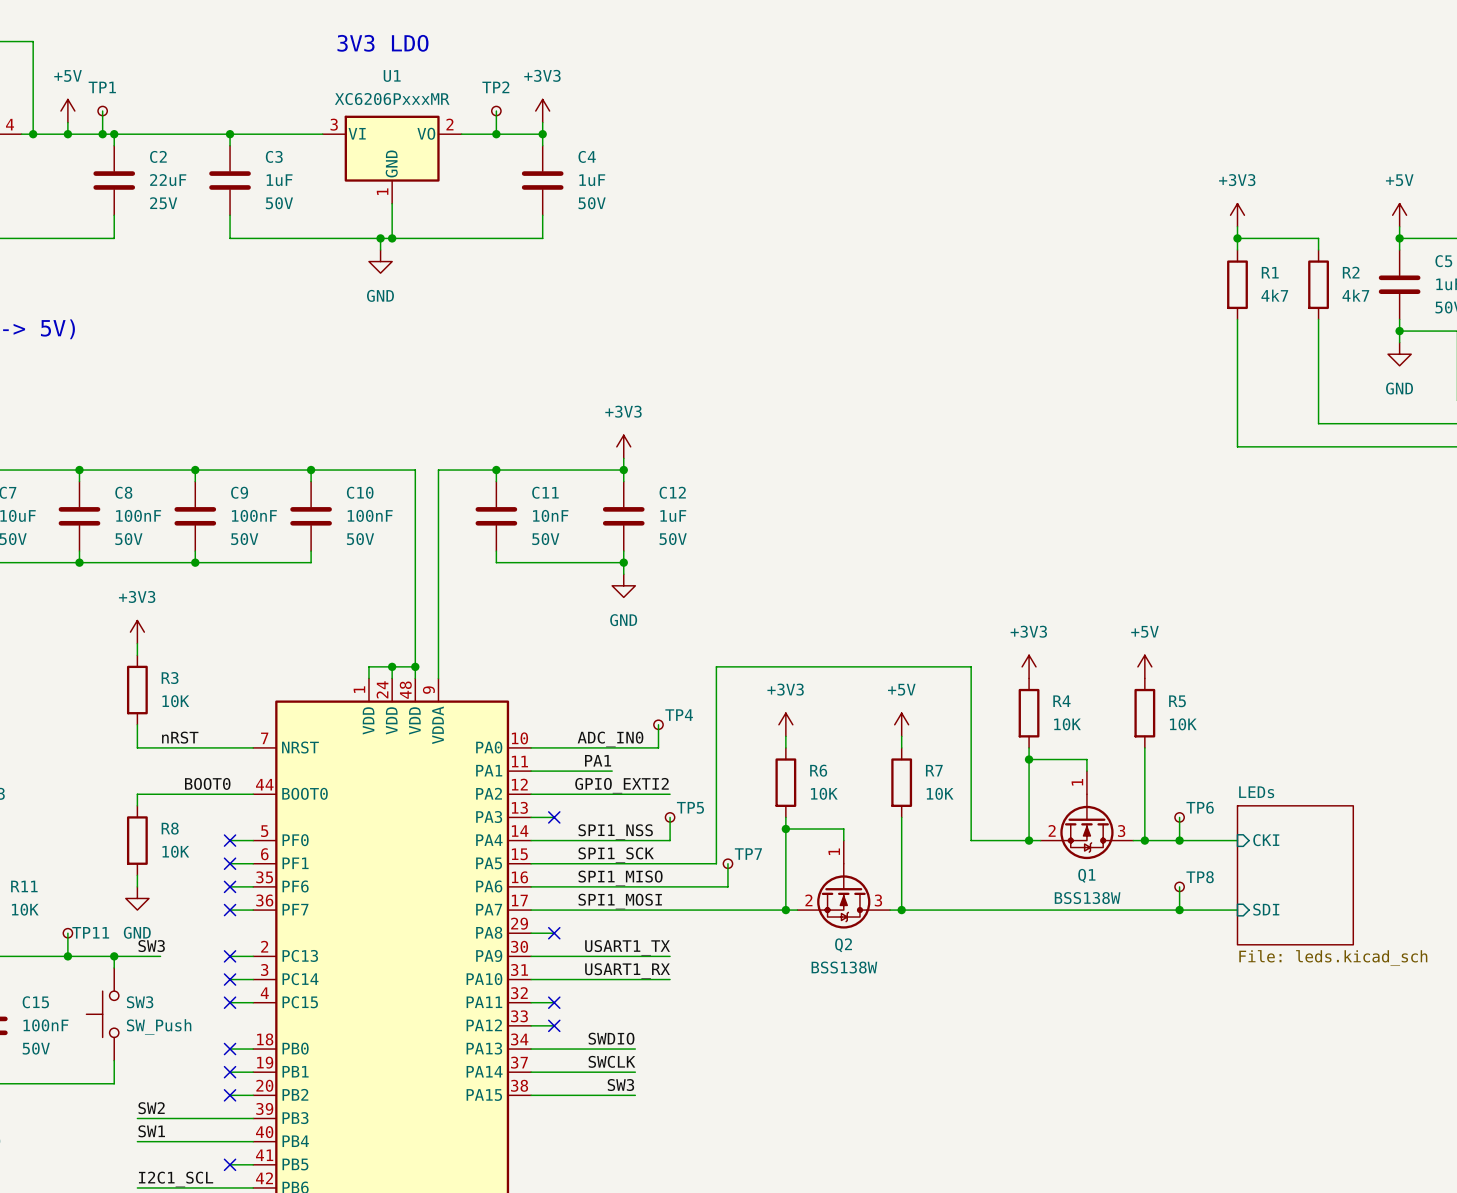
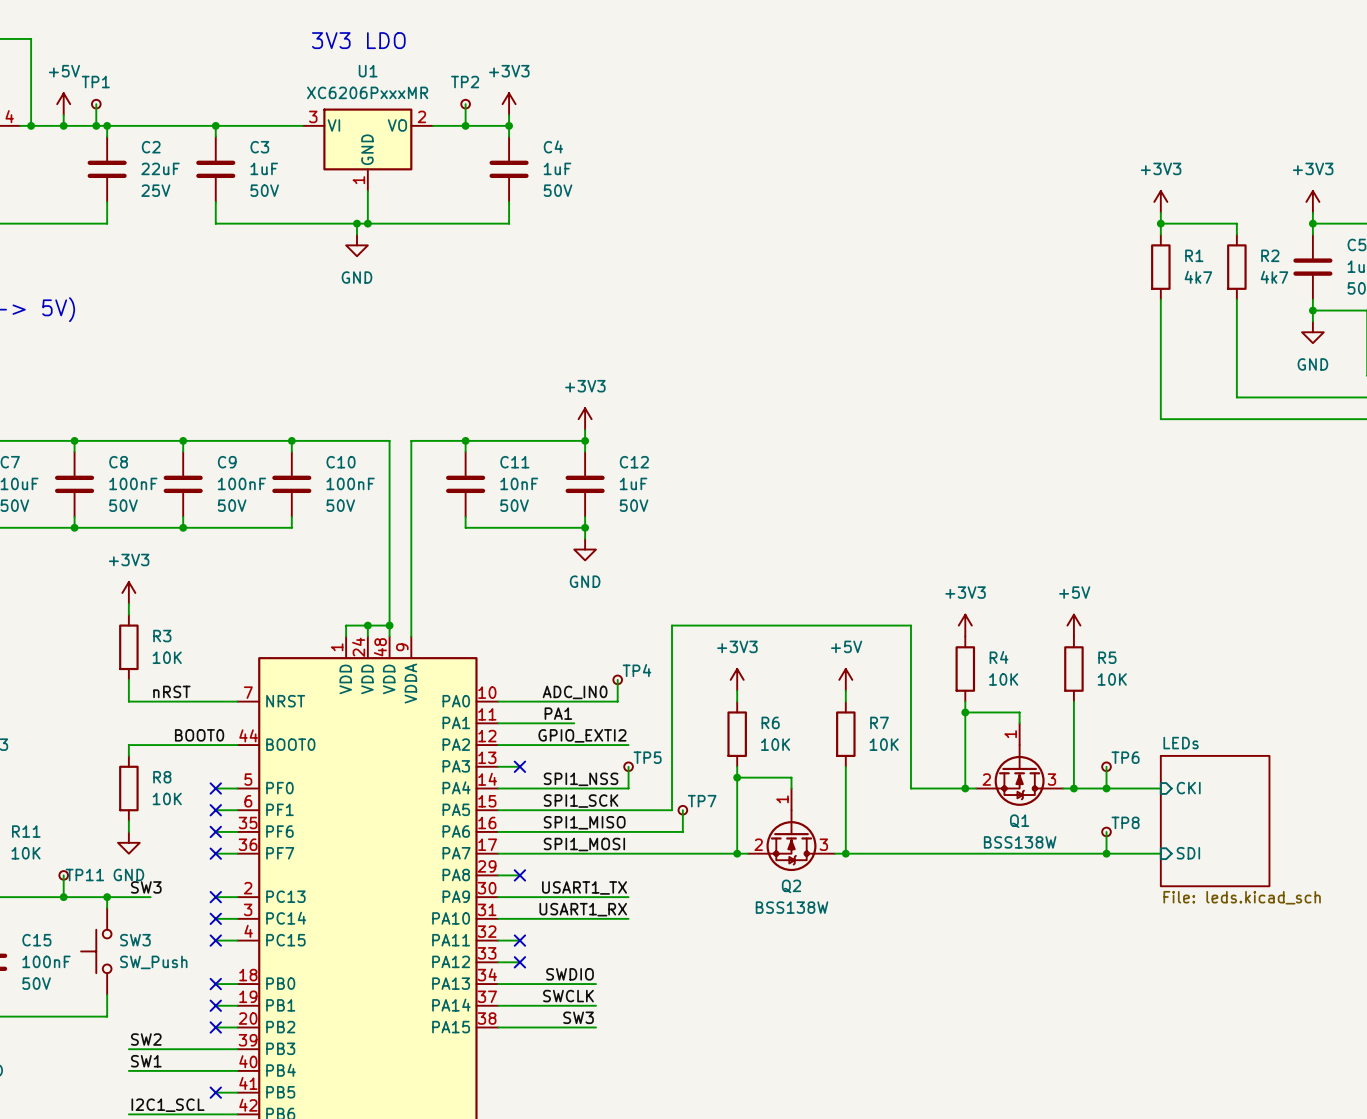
power symbol: +5V (1399, 215) -> +3V3 (1312, 201)

